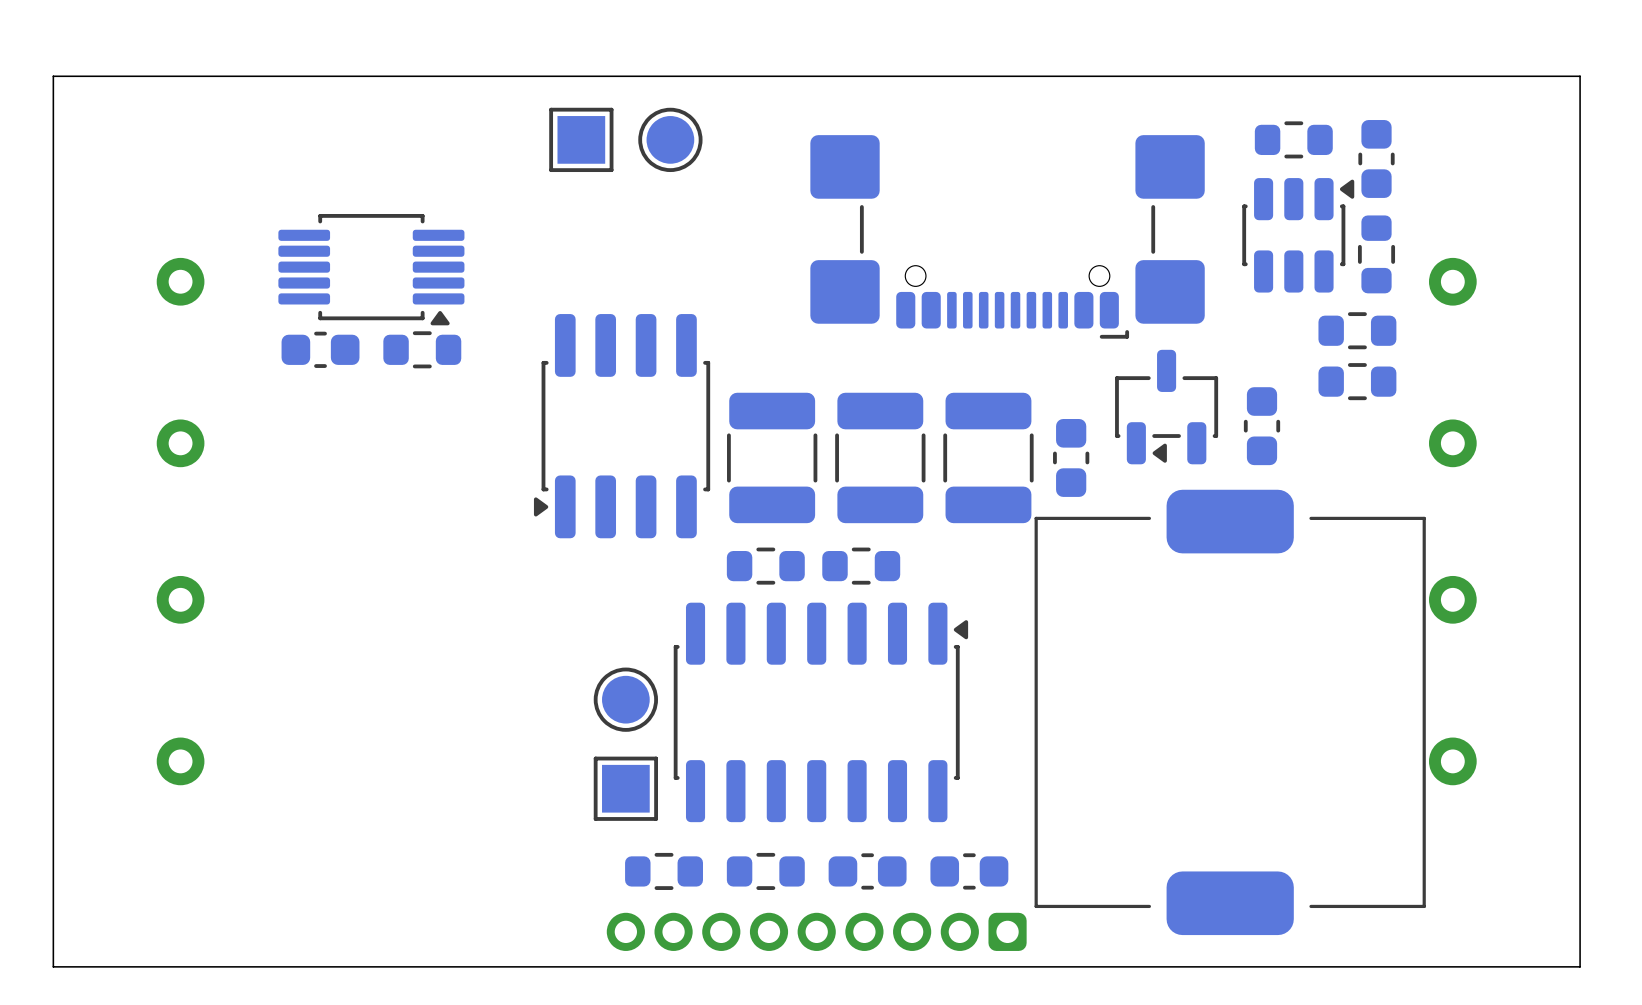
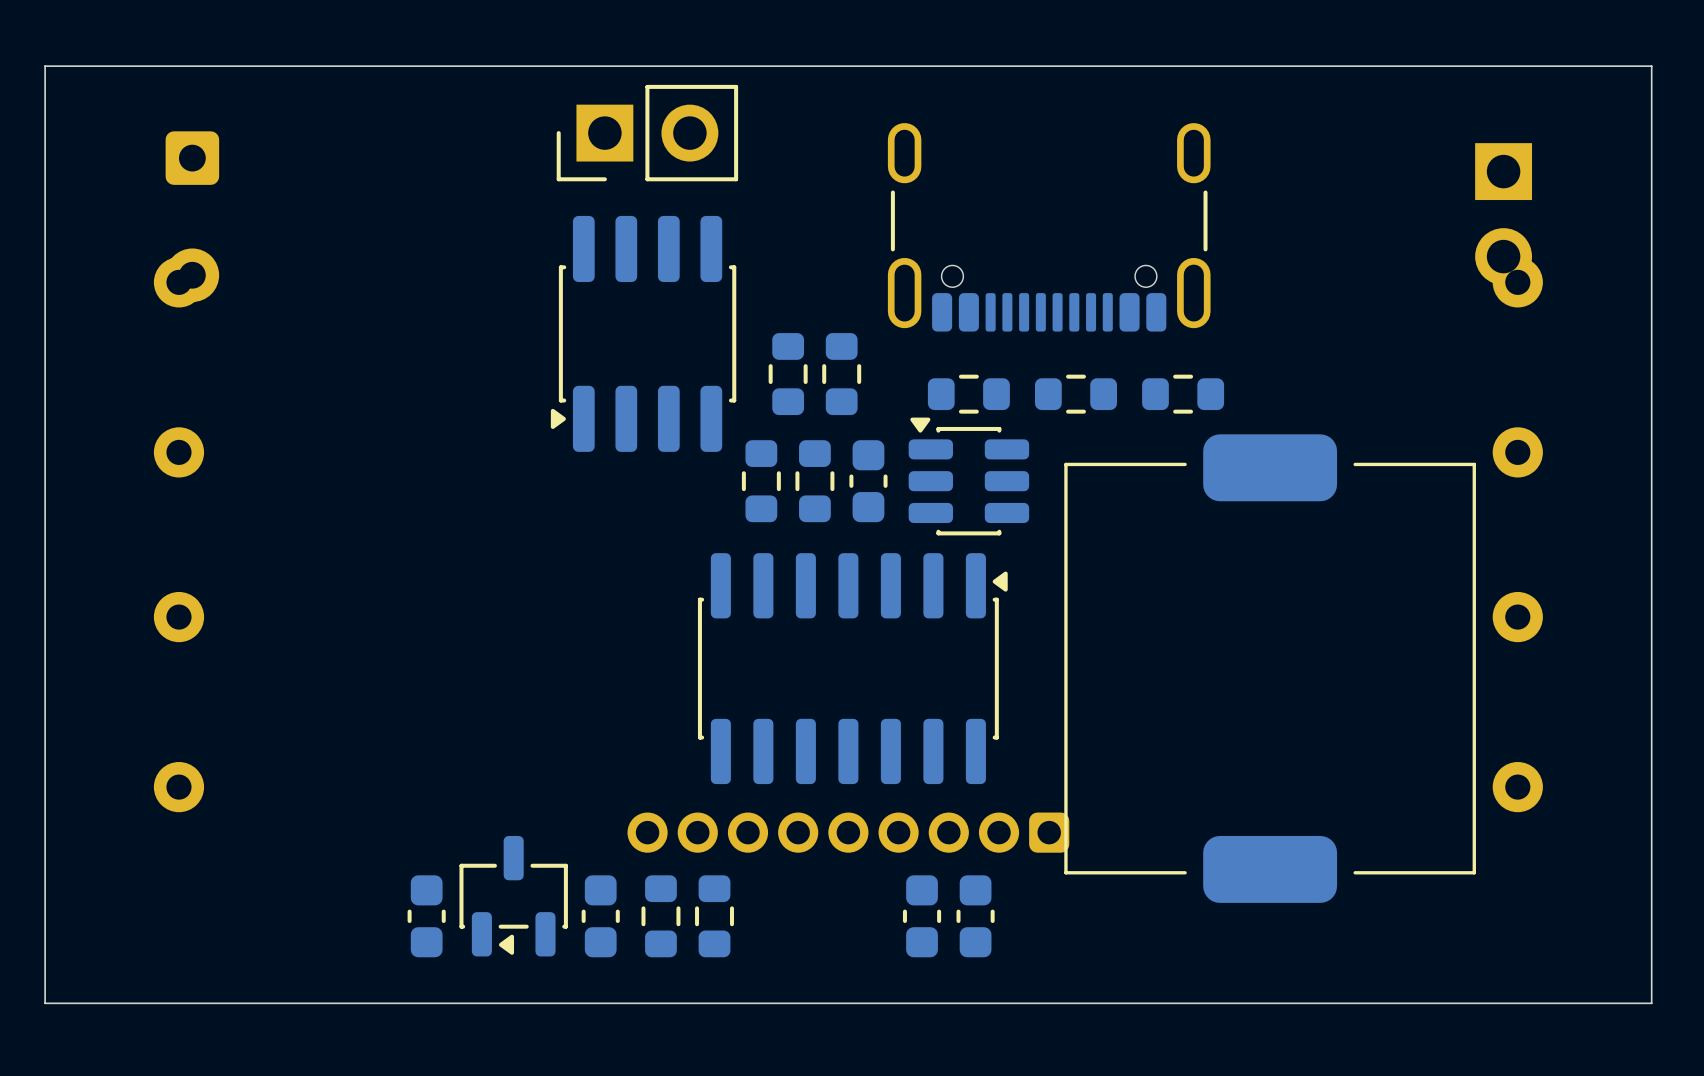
part footprint: [810, 135, 1205, 339] -> [887, 123, 1211, 332]
part: (581, 139) -> none
part: none -> (647, 133)
part: (670, 139) -> none
part: (1293, 139) -> none
part: (1376, 158) -> none
part: none -> (1503, 214)
part: none -> (192, 216)
part rotation: 0° (1298, 235) -> 90° counterclockwise (968, 476)
part position: (1298, 235) -> (968, 476)
part: (1376, 254) -> none
part: (371, 269) -> none
part: (1357, 330) -> none
part: (320, 349) -> none
part: (422, 349) -> none
part: none -> (788, 374)
part: none -> (841, 374)
part: (1357, 381) -> none
part: none -> (968, 394)
part: none -> (1075, 394)
part: none -> (1183, 394)
part footprint: [727, 392, 818, 524] -> [795, 440, 835, 523]
part: (1166, 407) -> none
part position: (622, 426) -> (643, 333)
part: (1262, 426) -> none
part: (880, 457) -> none
part: (988, 457) -> none
part: (1071, 457) -> none
part: none -> (761, 481)
part: none -> (868, 481)
part: (765, 566) -> none
part: (861, 566) -> none
part: (625, 699) -> none
part position: (820, 712) -> (852, 668)
part position: (1230, 712) -> (1270, 668)
part: (625, 788) -> none
part: none -> (513, 896)
part: (664, 871) -> none
part: (765, 871) -> none
part rotation: 0° (867, 871) -> 90° clockwise (922, 916)
part rotation: 0° (969, 871) -> 90° clockwise (975, 916)
part: none -> (426, 916)
part: none -> (600, 916)
part: none -> (660, 916)
part: none -> (714, 916)
part position: (816, 931) -> (848, 832)

